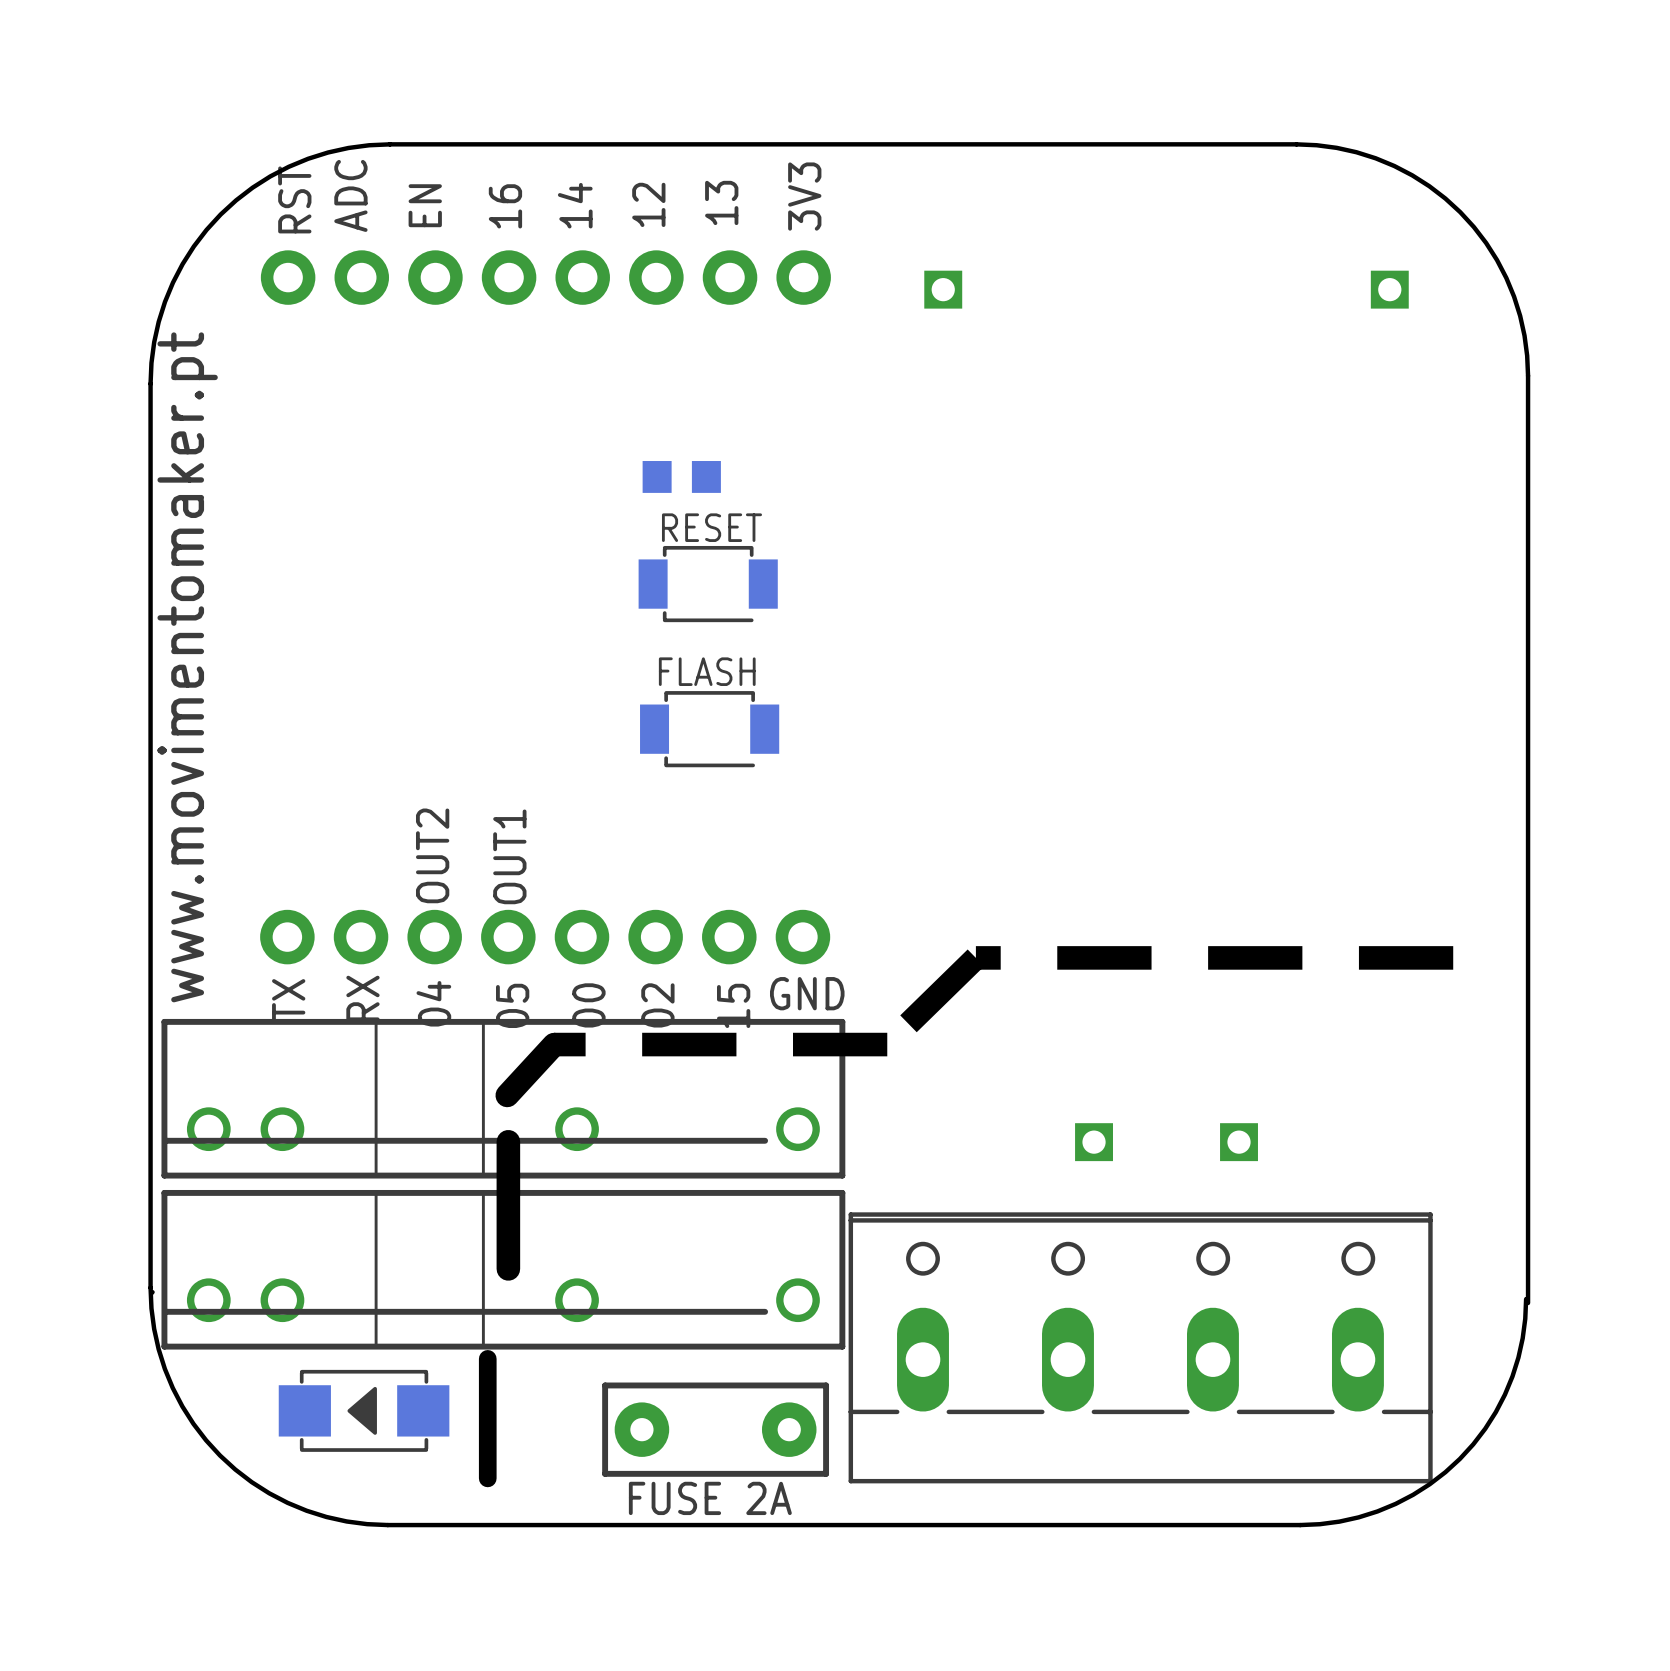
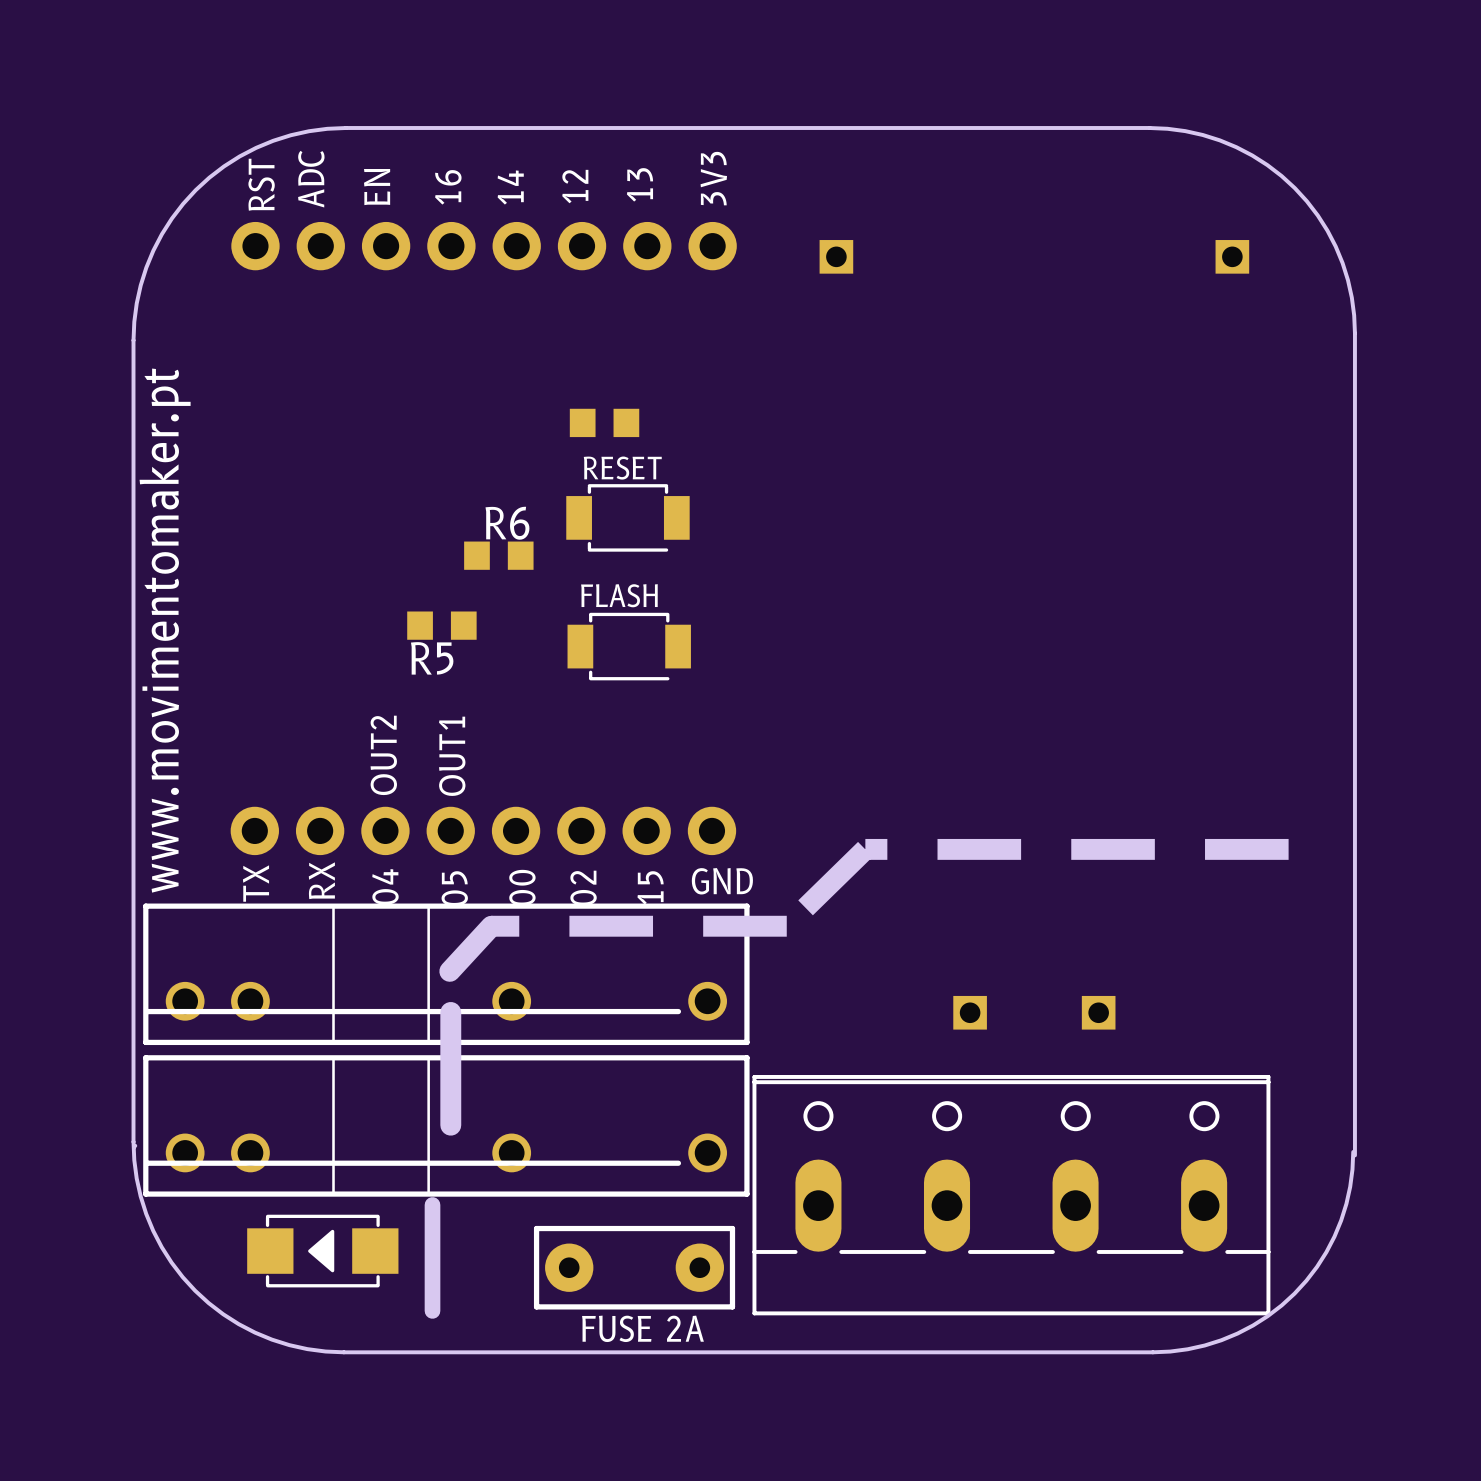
R6: none -> (498, 555)
R5: none -> (441, 625)

